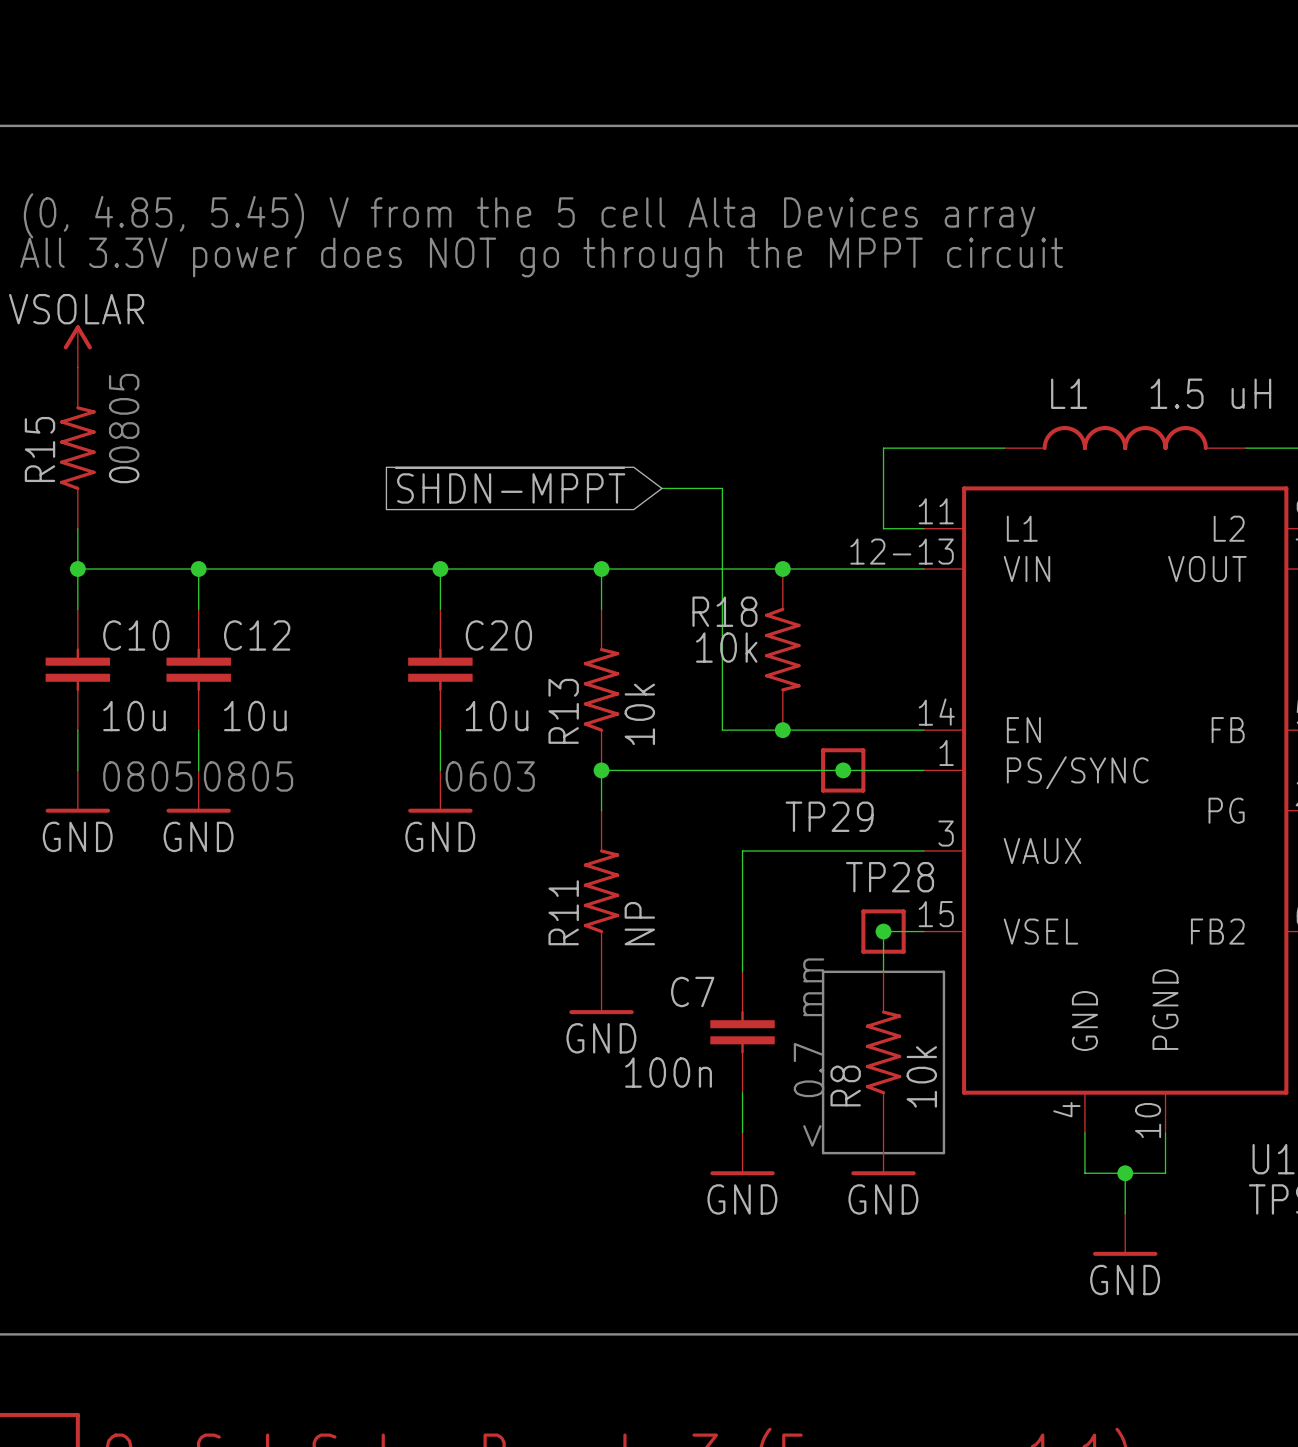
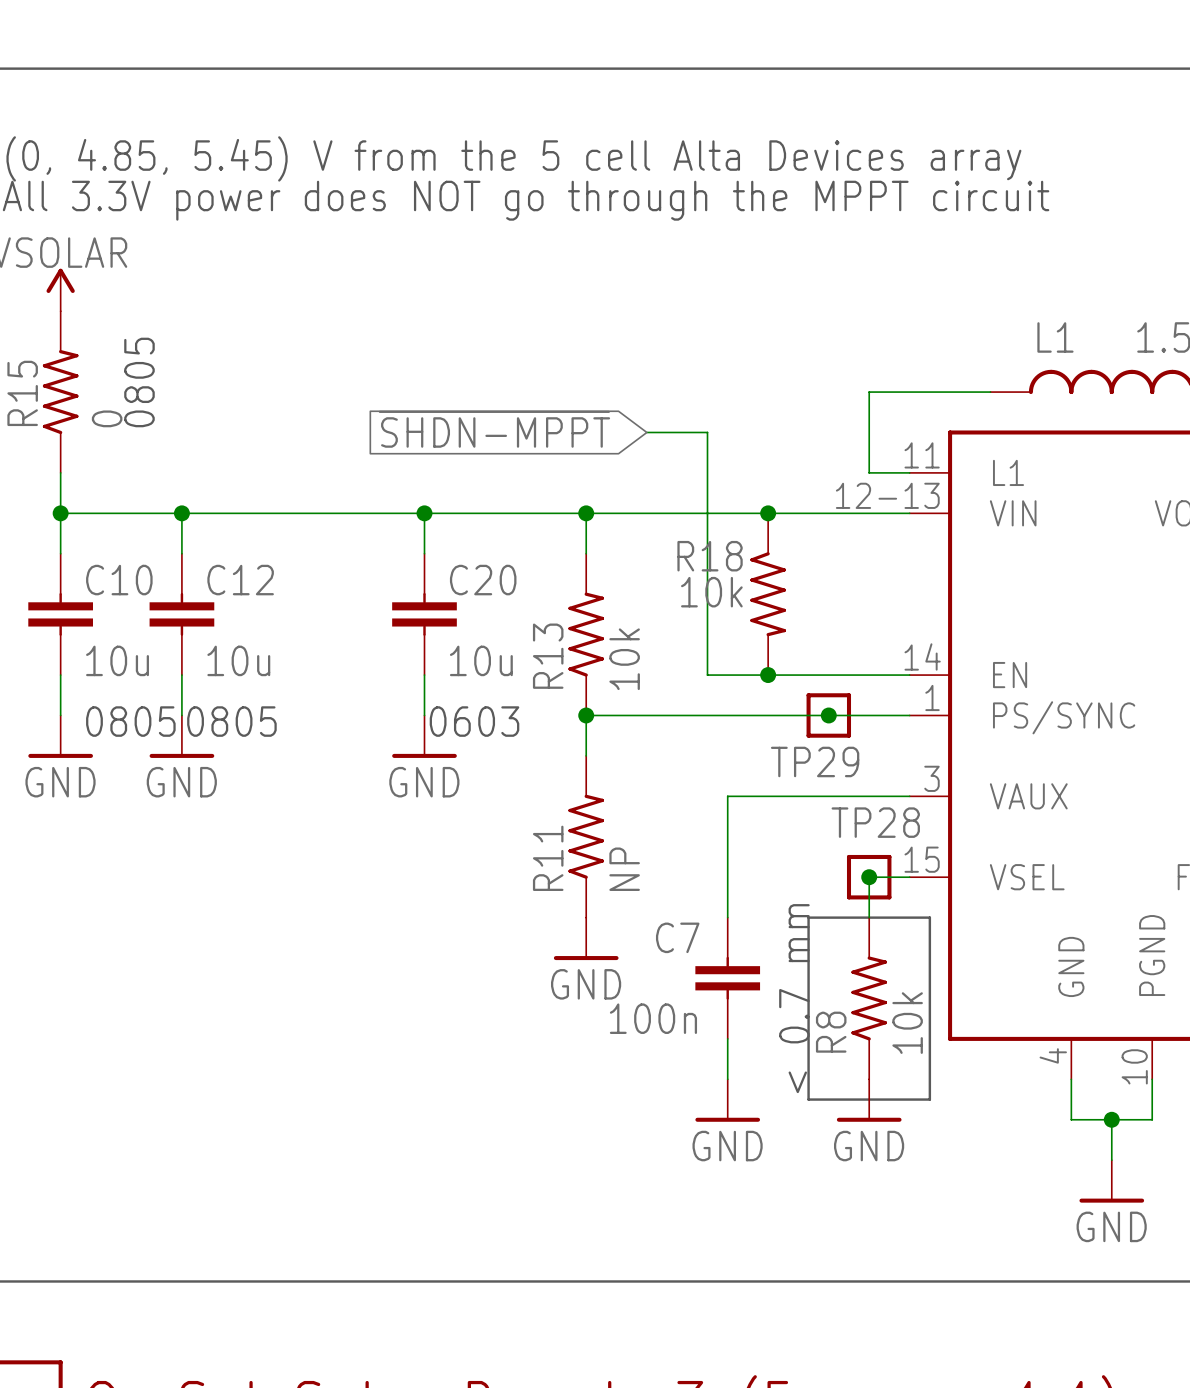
text position: 0805 (124, 418) -> 0805 (139, 382)

